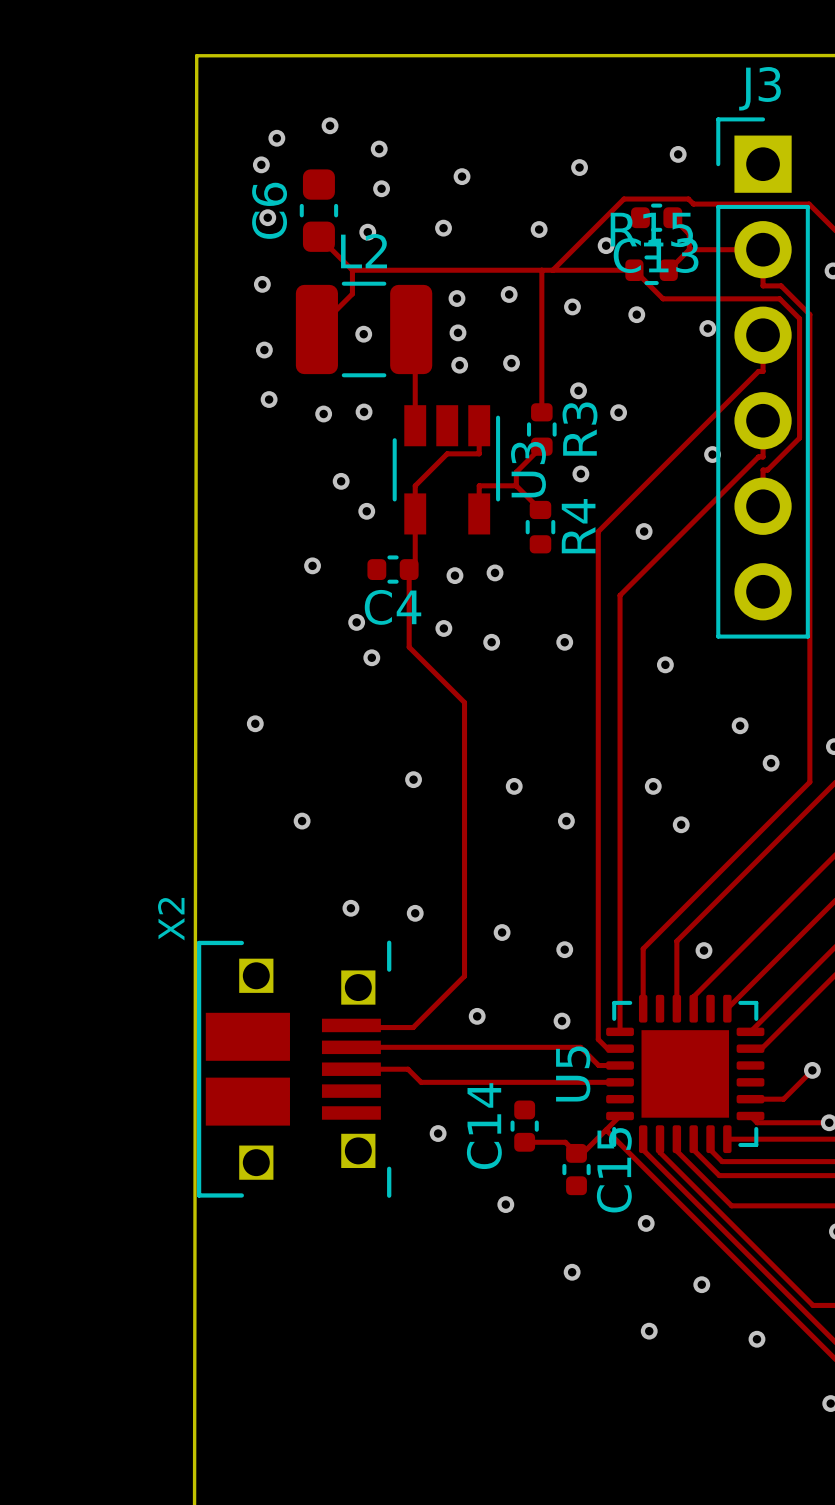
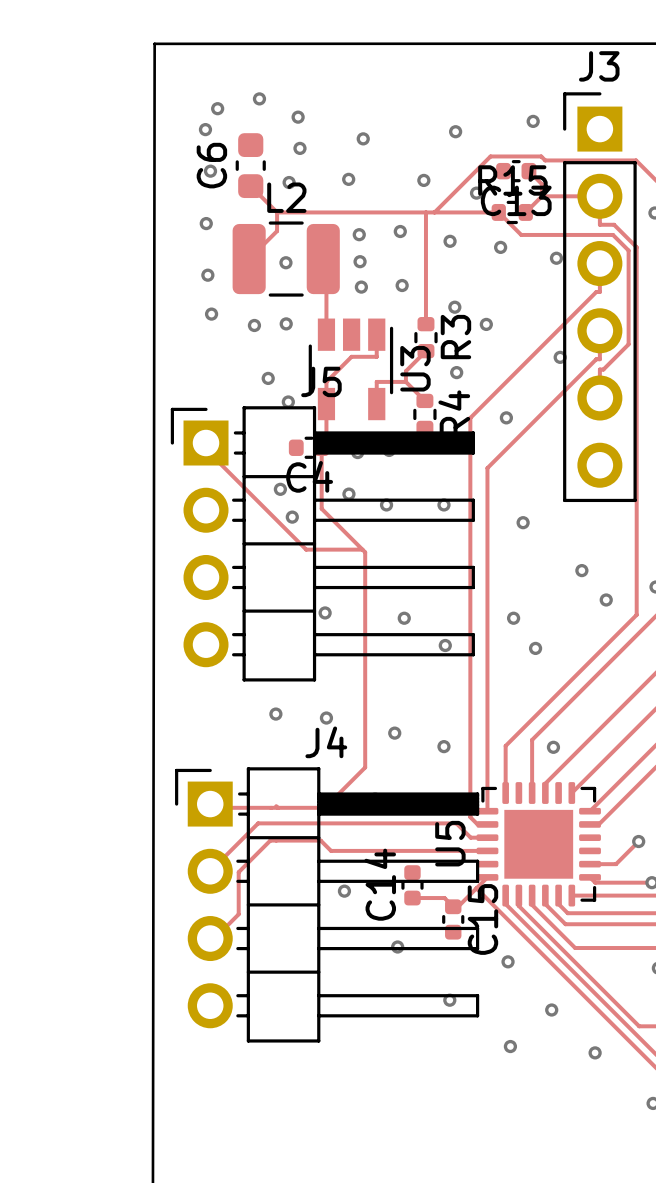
track: none -> (206, 443) (206, 449) (306, 549) (362, 549)
via: (312, 565) -> none
J5: none -> (322, 543)
via: (255, 723) -> none
via: (302, 821) -> none
track: none -> (210, 805) (213, 807) (271, 807)
track: none -> (276, 823) (258, 823) (210, 871)
X2: (294, 1069) -> none
track: none -> (276, 840) (270, 840) (238, 872) (238, 914) (211, 941)
J4: none -> (327, 904)

